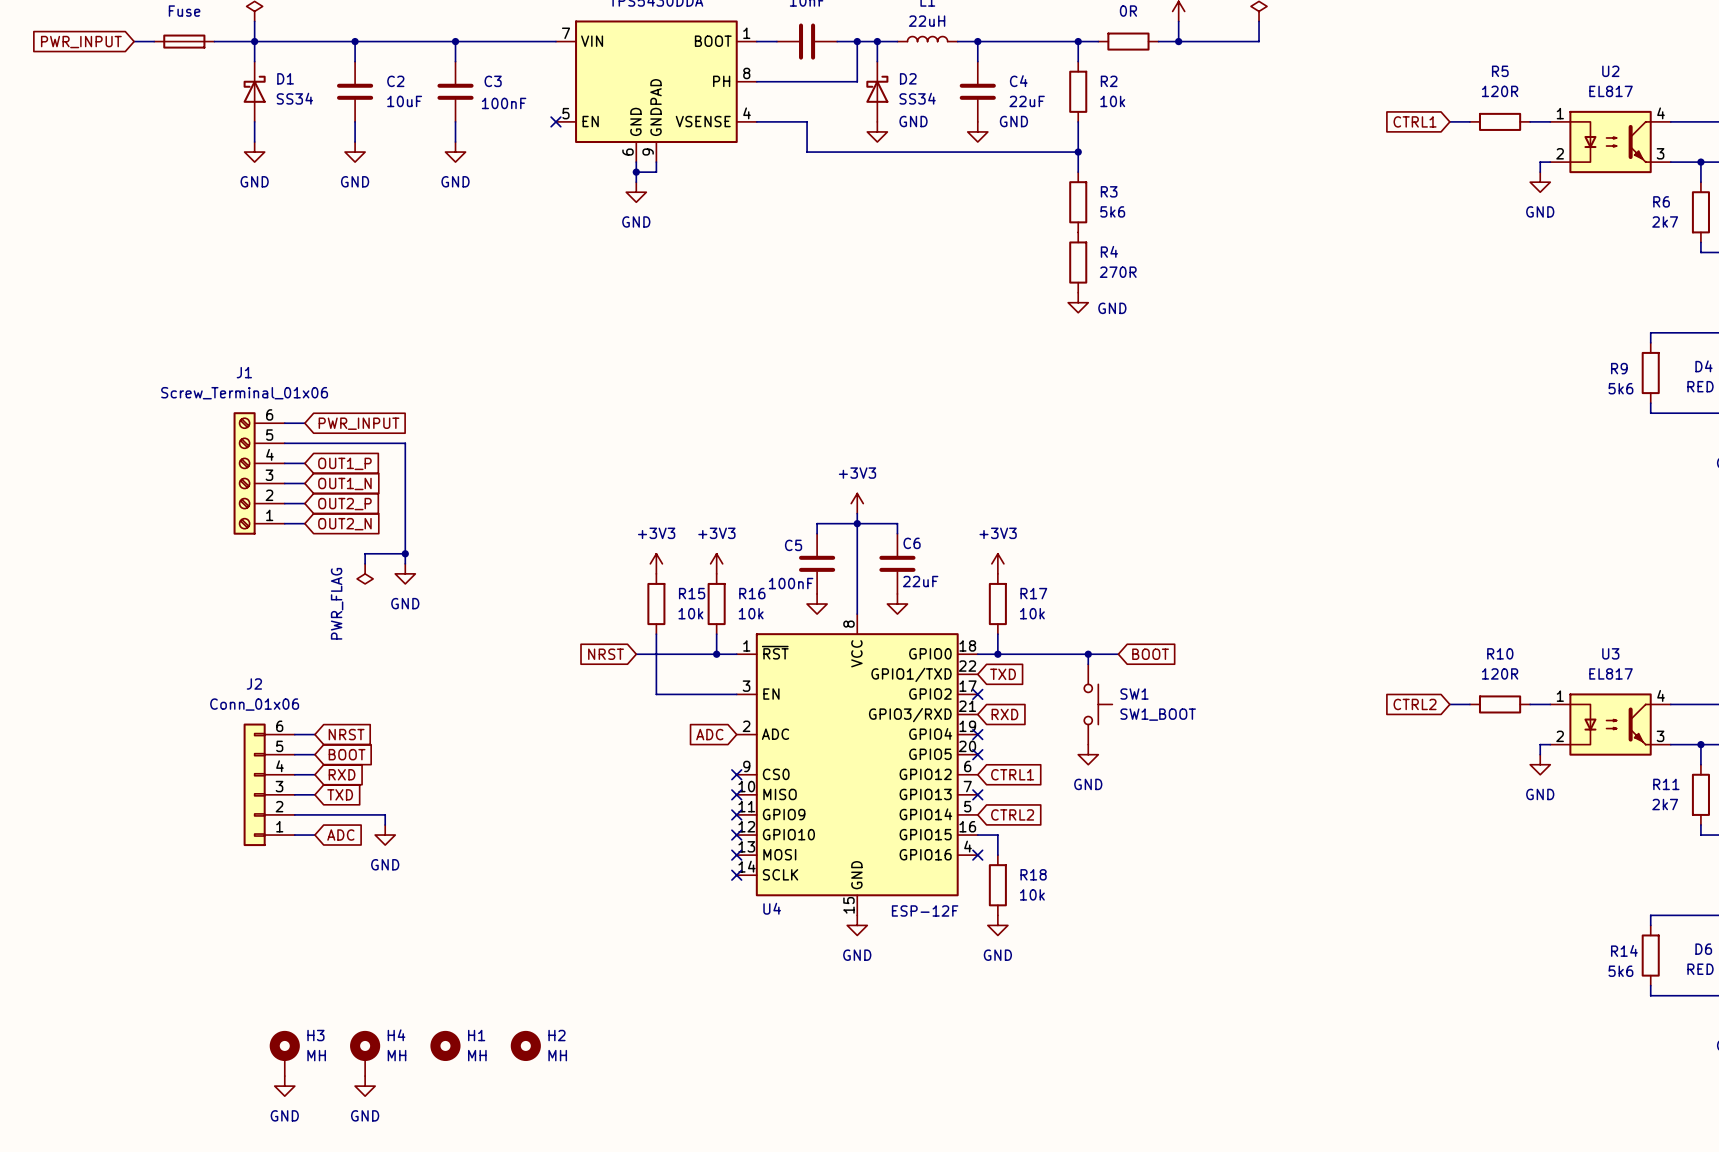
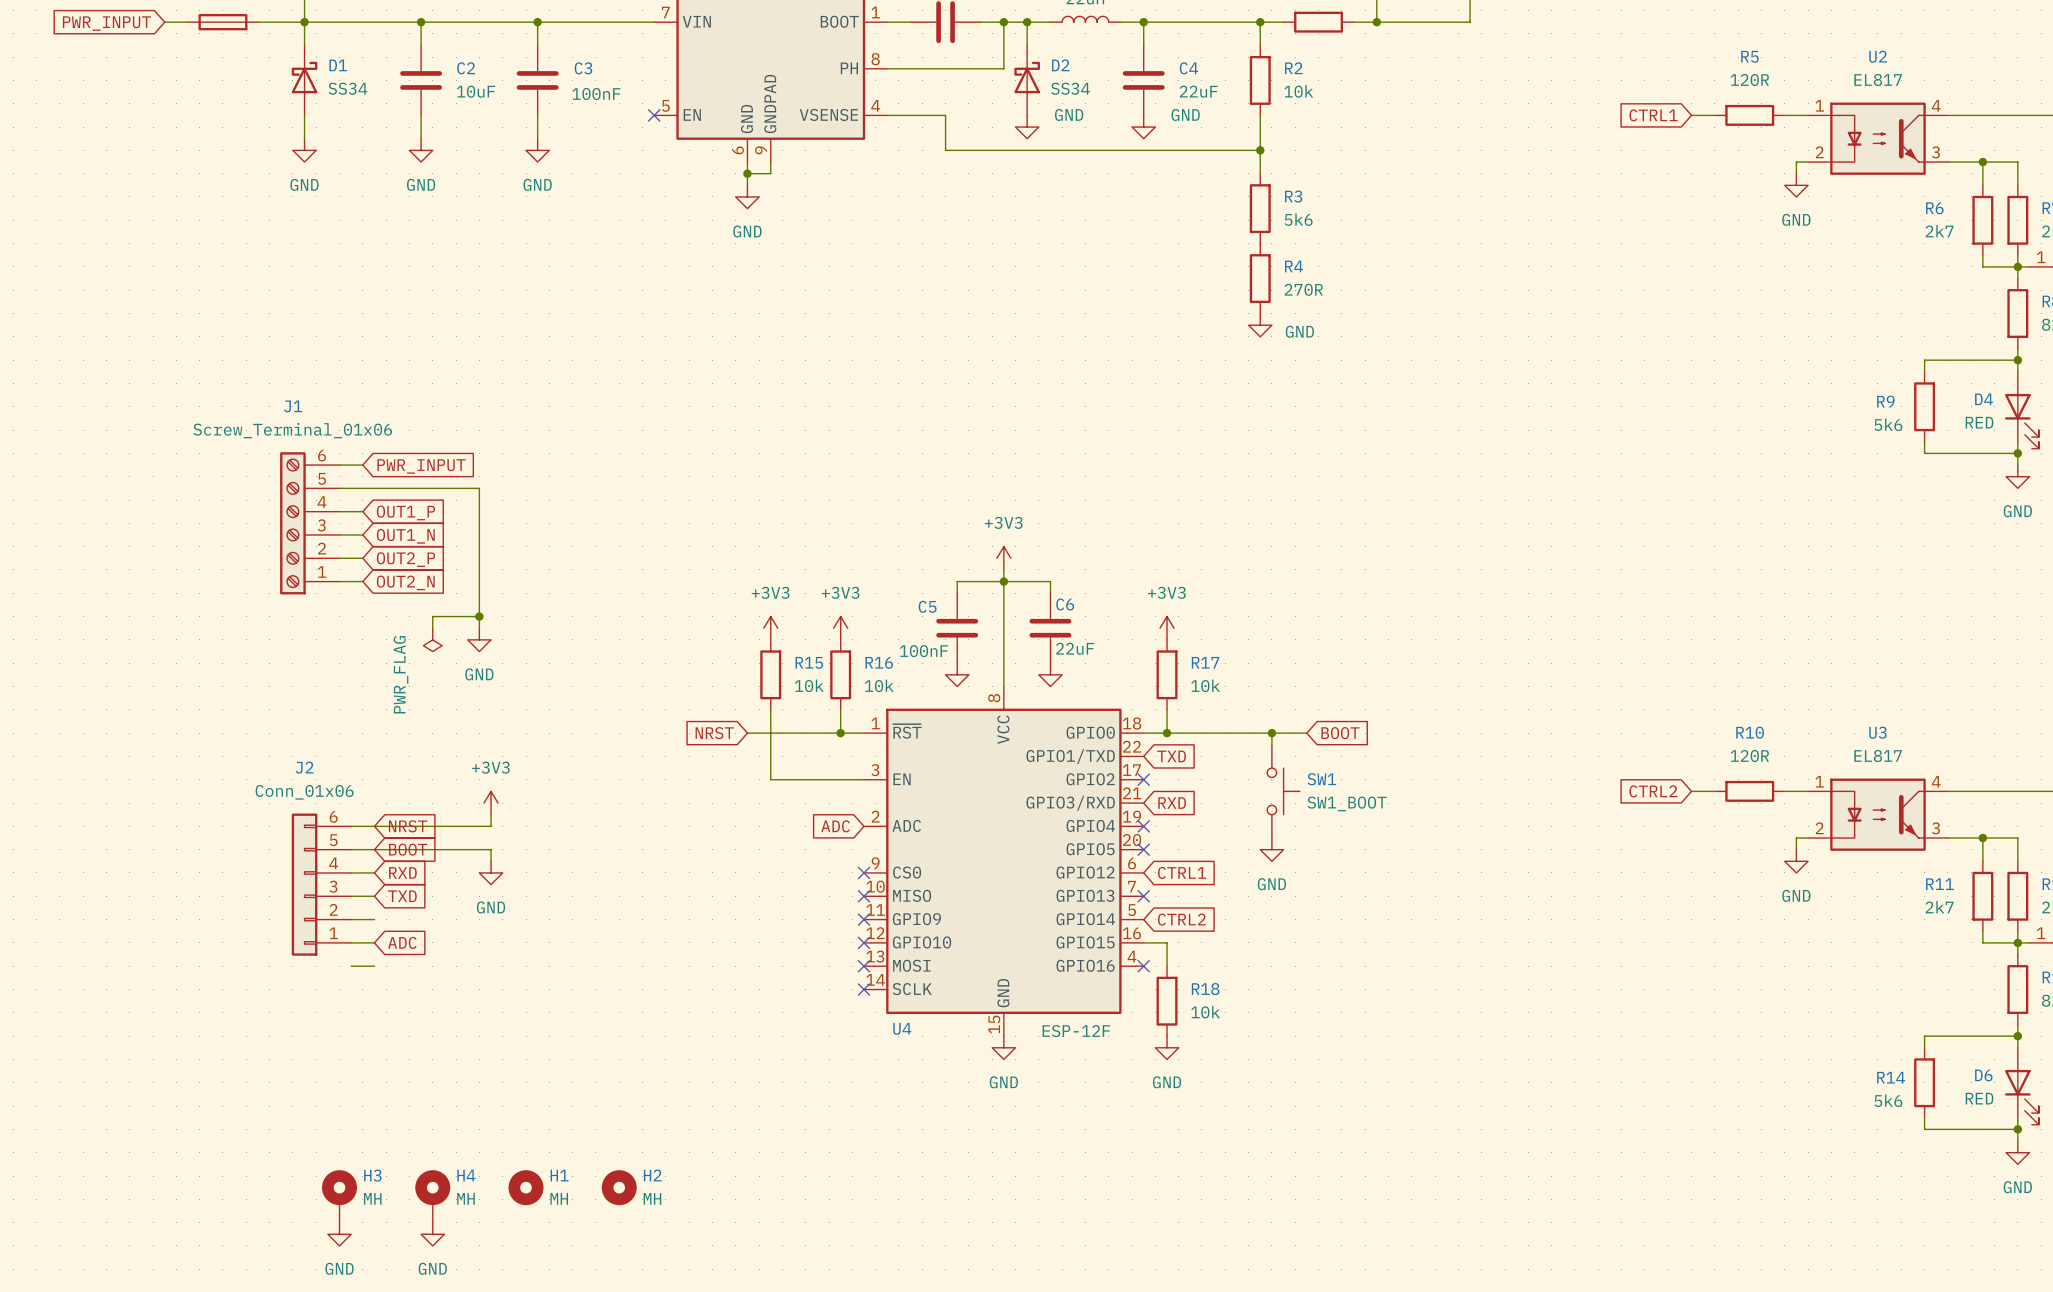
power symbol: none -> +3V3 (491, 803)
wire: none -> (491, 814) (491, 826) (374, 826)
wire: none -> (374, 849) (491, 849) (491, 861)
wire: (314, 814) (385, 814) (385, 824) -> none
power symbol position: GND (385, 835) -> GND (491, 872)
wire: none -> (351, 966) (374, 966)

